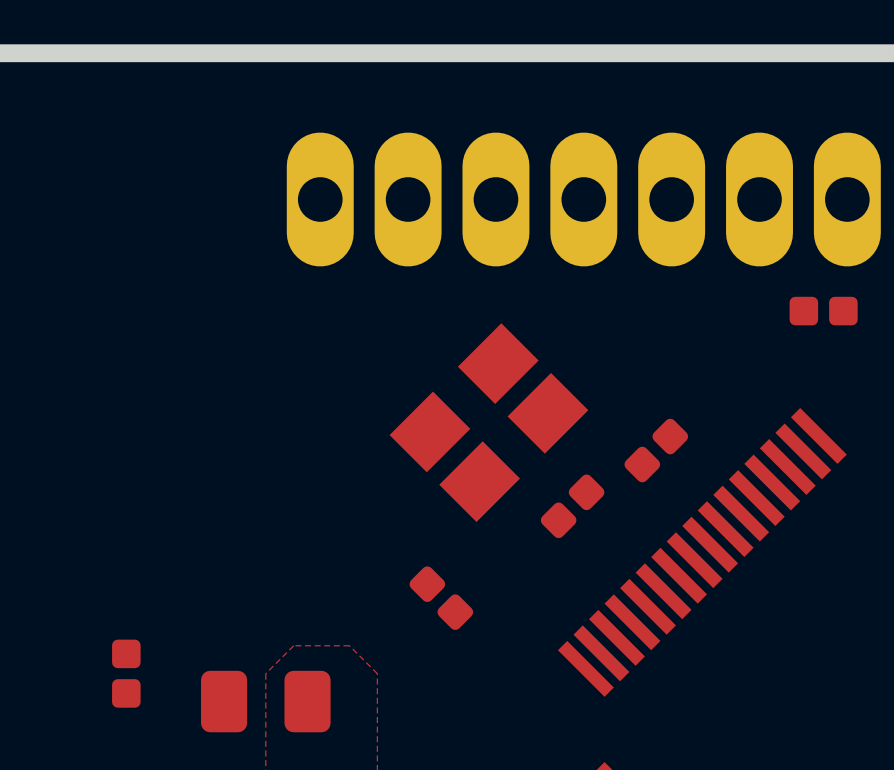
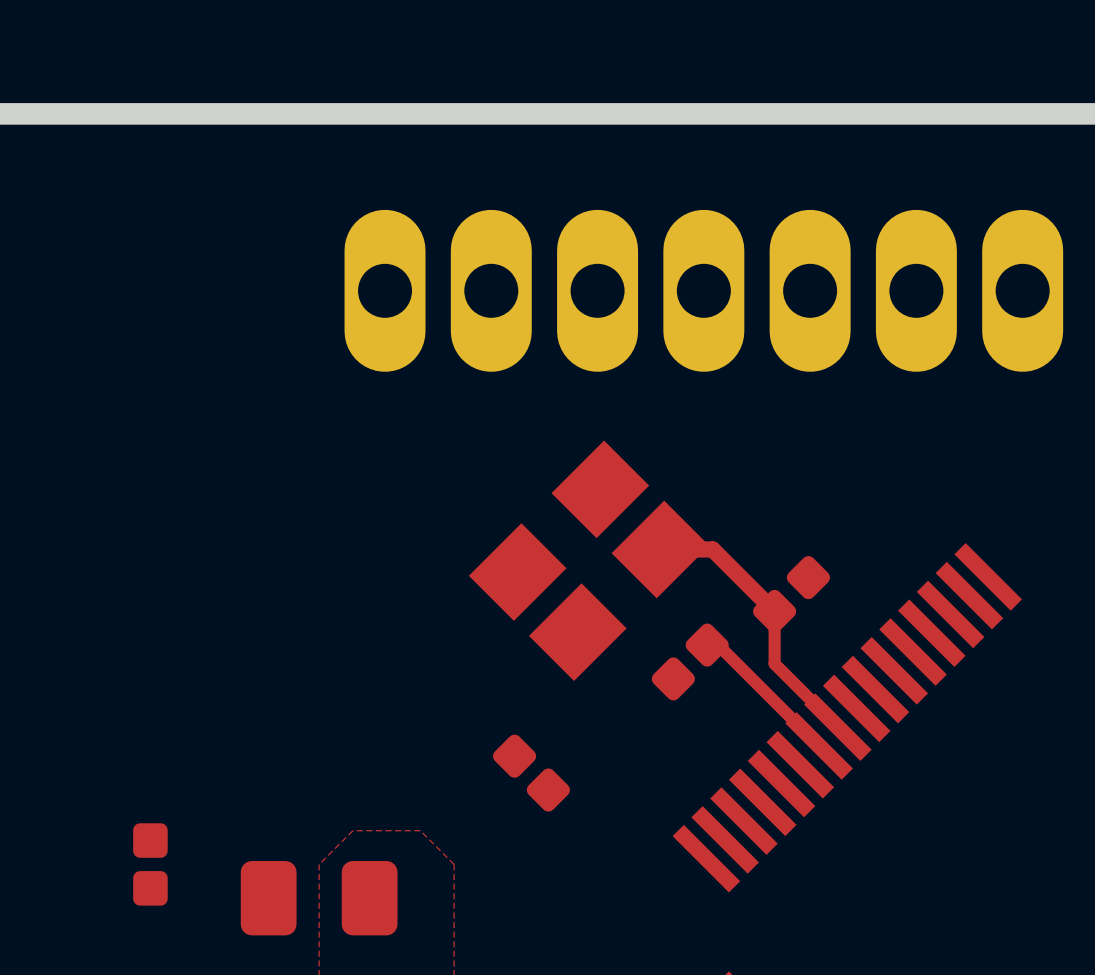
part: (823, 311) -> none
top track: none -> (660, 549) (712, 549) (774, 611) (774, 663) (837, 727)
top track: none -> (707, 645) (718, 645) (819, 745)

